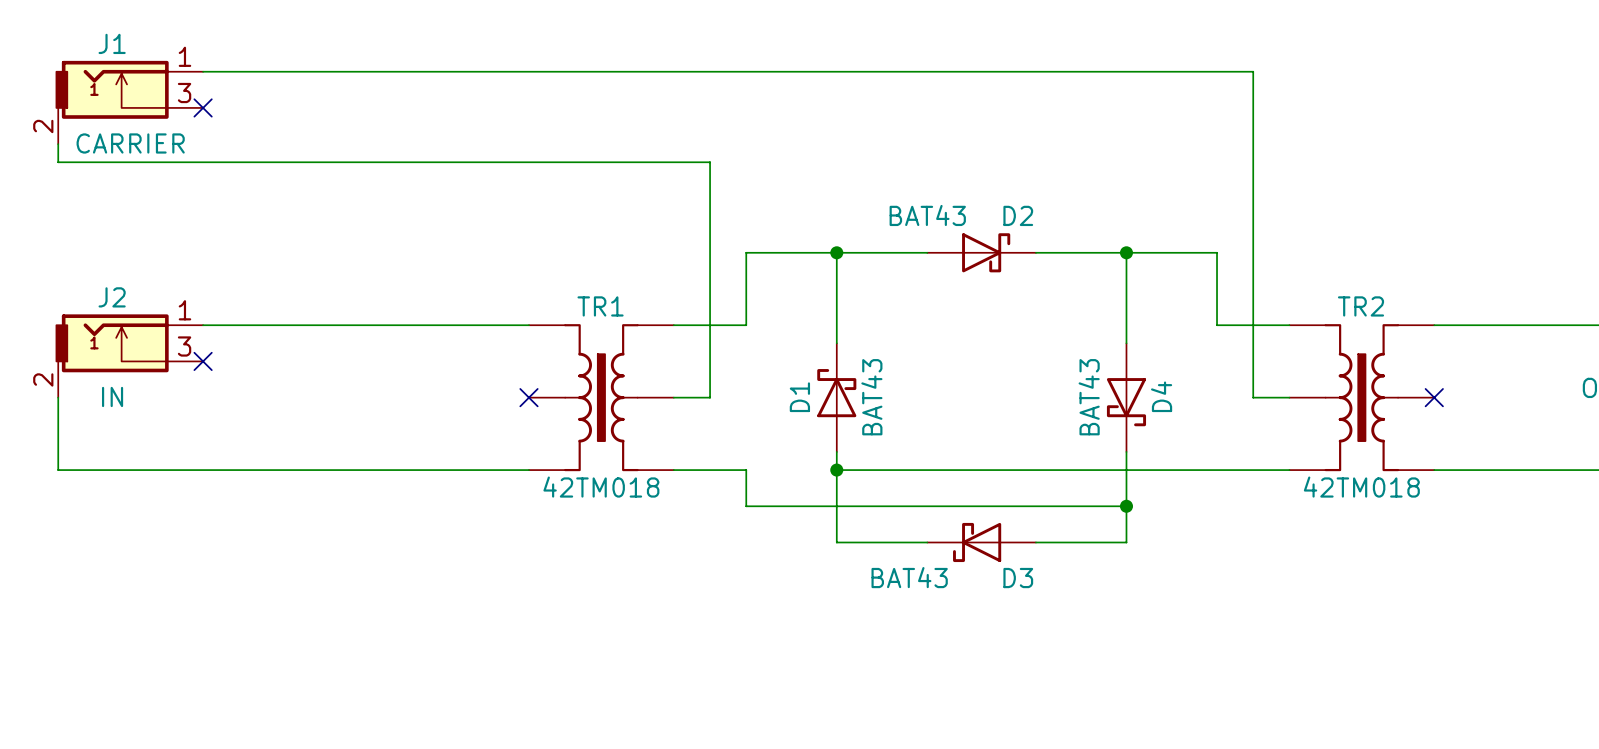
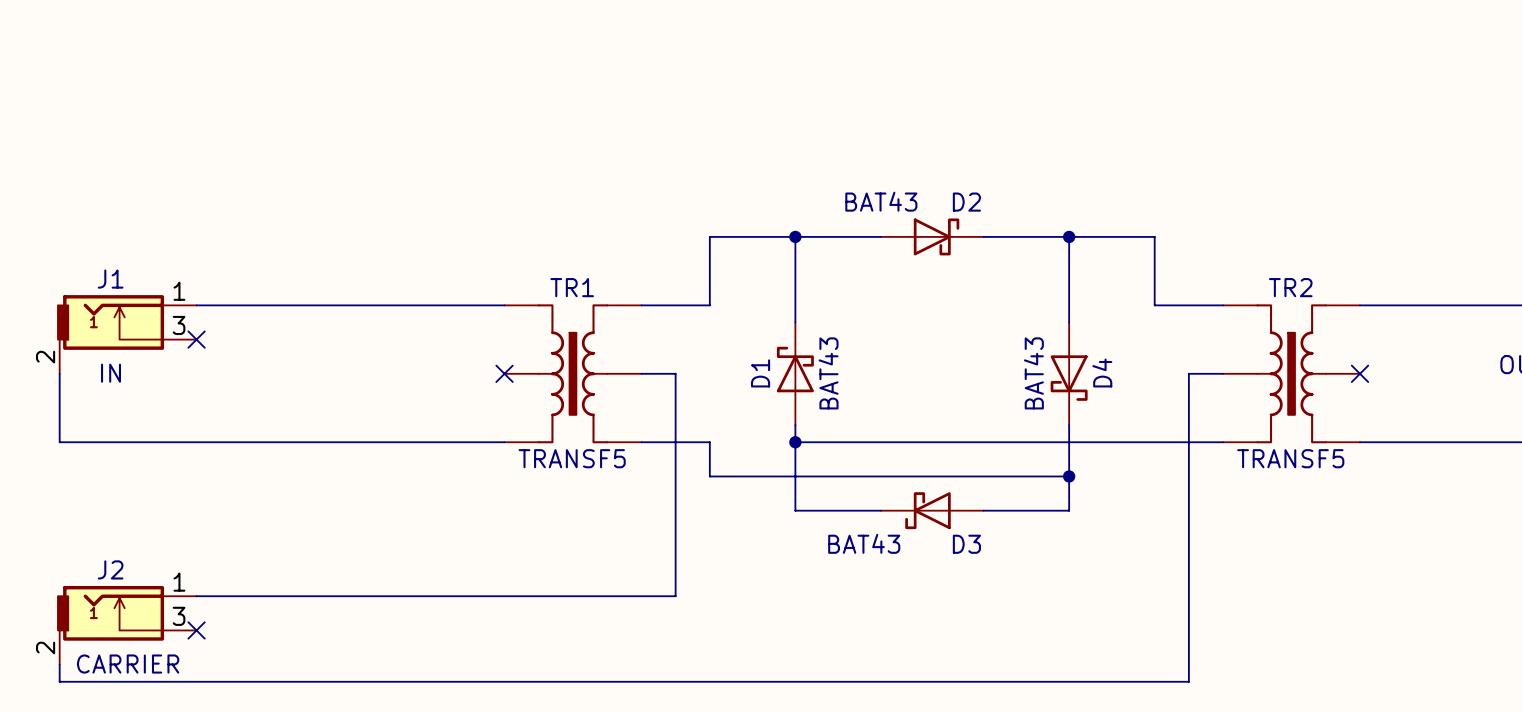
wire: (203, 71) (1253, 71) (1253, 397) -> (59, 664) (59, 681) (1188, 681) (1188, 373)
J1: CARRIER (129, 102) -> none
no-connect mark: (203, 107) -> none
wire: (58, 144) (58, 162) (710, 162) (710, 397) -> (196, 596) (675, 596) (675, 373)
J2 name: J2 (112, 297) -> J1 (110, 279)
TR1 value: 42TM018 (601, 487) -> TRANSF5 (572, 458)
TR2 value: 42TM018 (1361, 487) -> TRANSF5 (1290, 458)
J2: none -> CARRIER (127, 625)
no-connect mark: none -> (196, 630)

